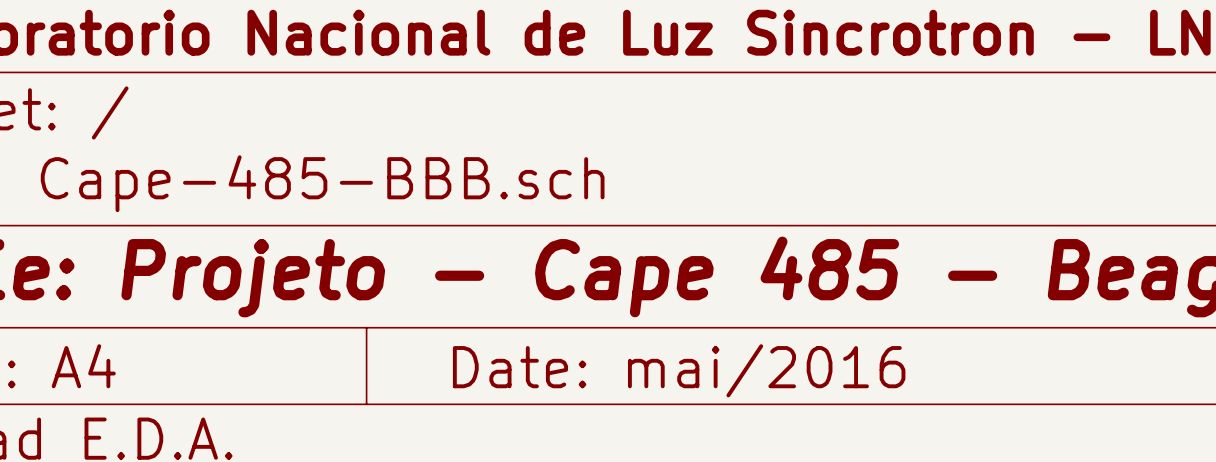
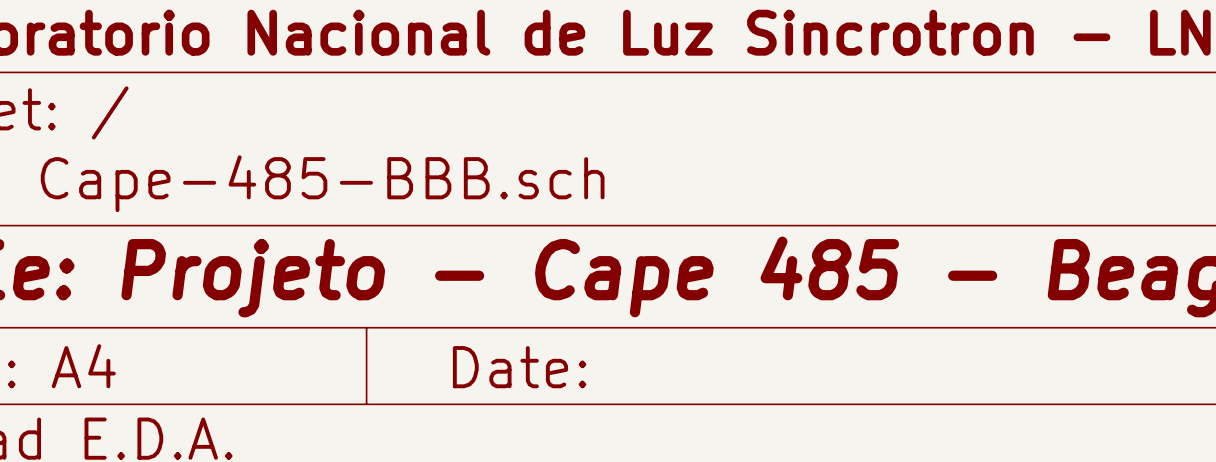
title block: Date: mai/2016 (679, 370) -> Date: (519, 367)

